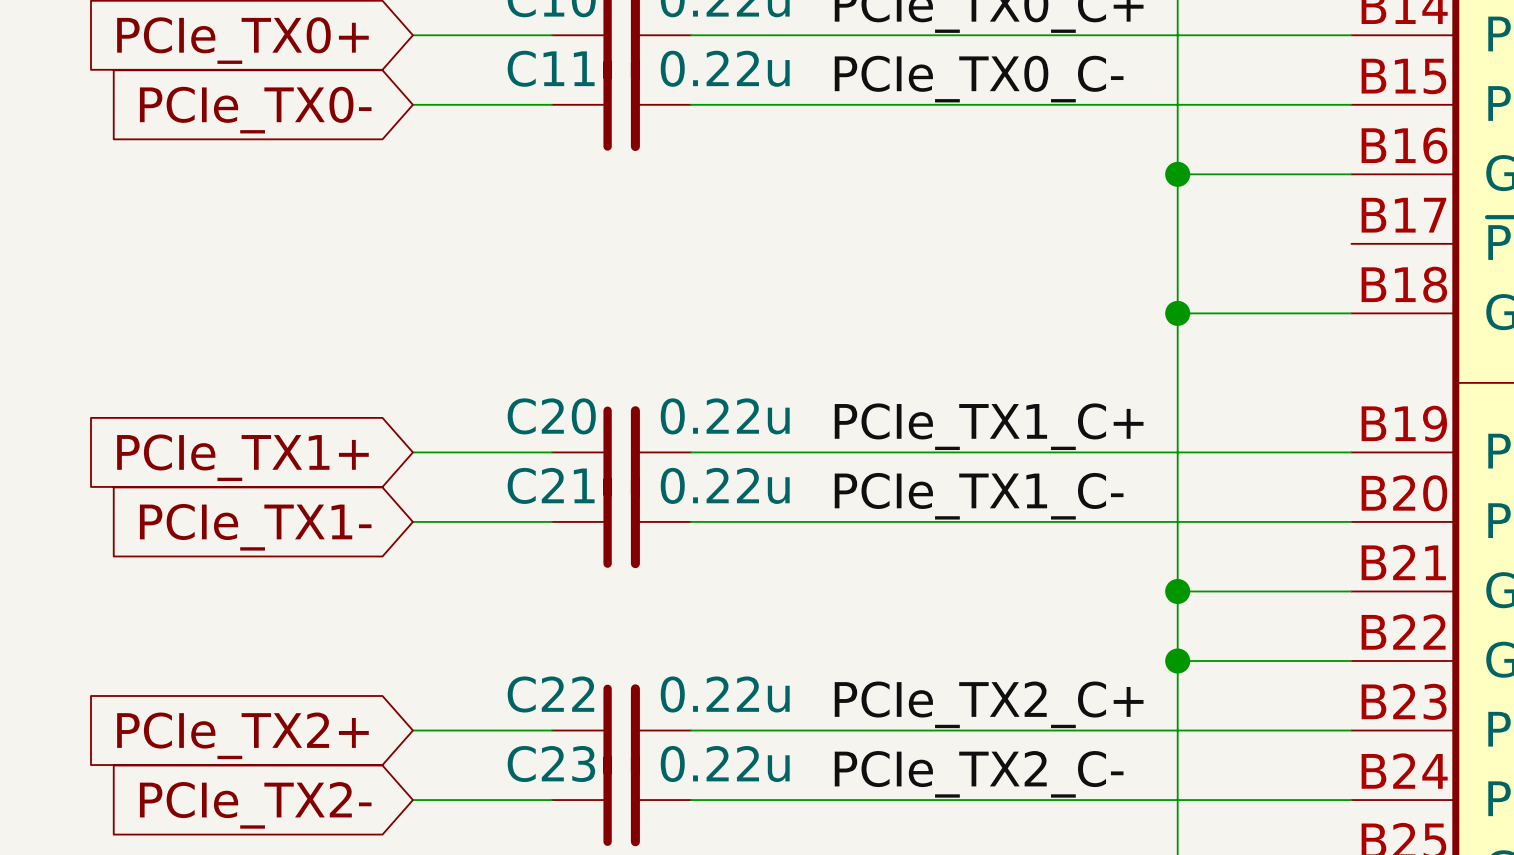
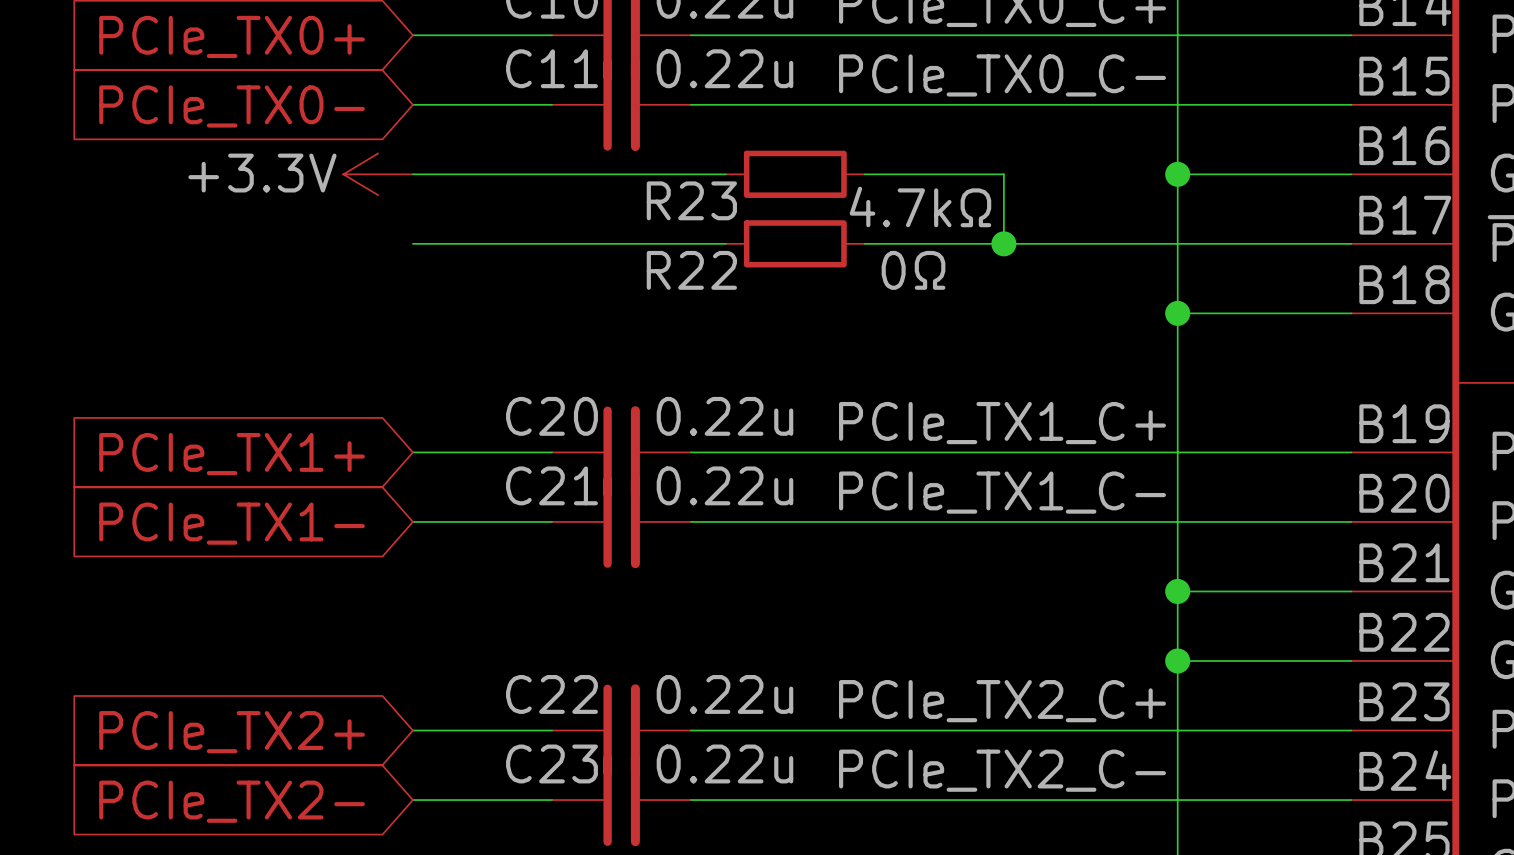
power symbol: none -> +3.3V (378, 174)
wire: none -> (412, 174) (725, 174)
R23: none -> 4.7kΩ (795, 174)
wire: none -> (864, 174) (1003, 174) (1003, 243)
wire: none -> (412, 243) (725, 243)
R22: none -> 0Ω (795, 243)
wire: none -> (864, 243) (1351, 243)
junction: none -> (1003, 243)

